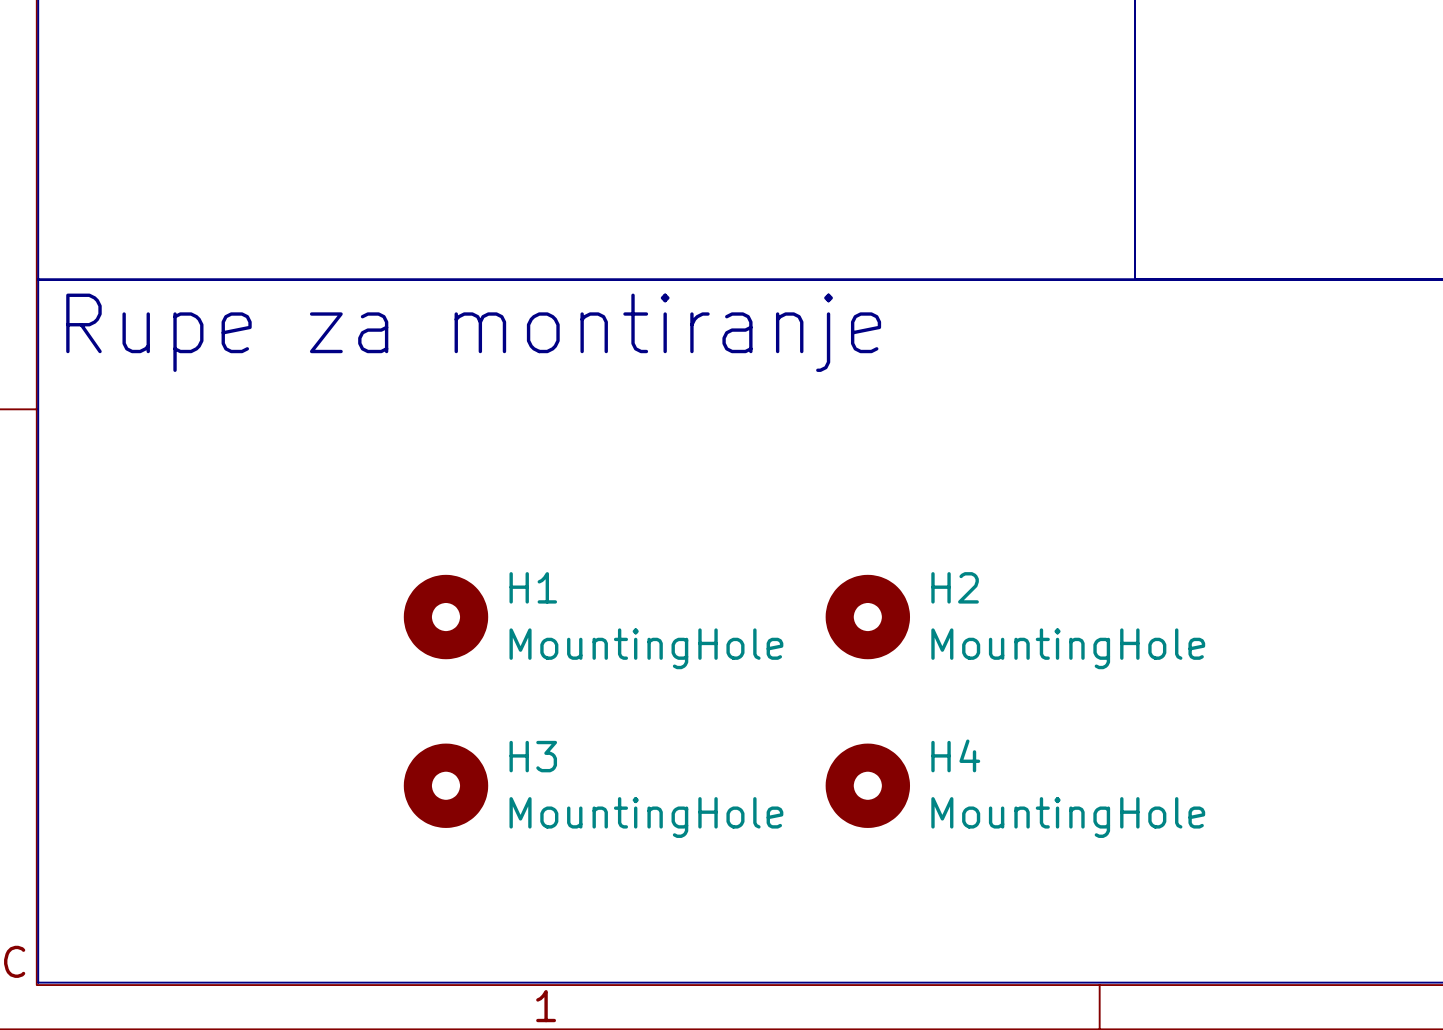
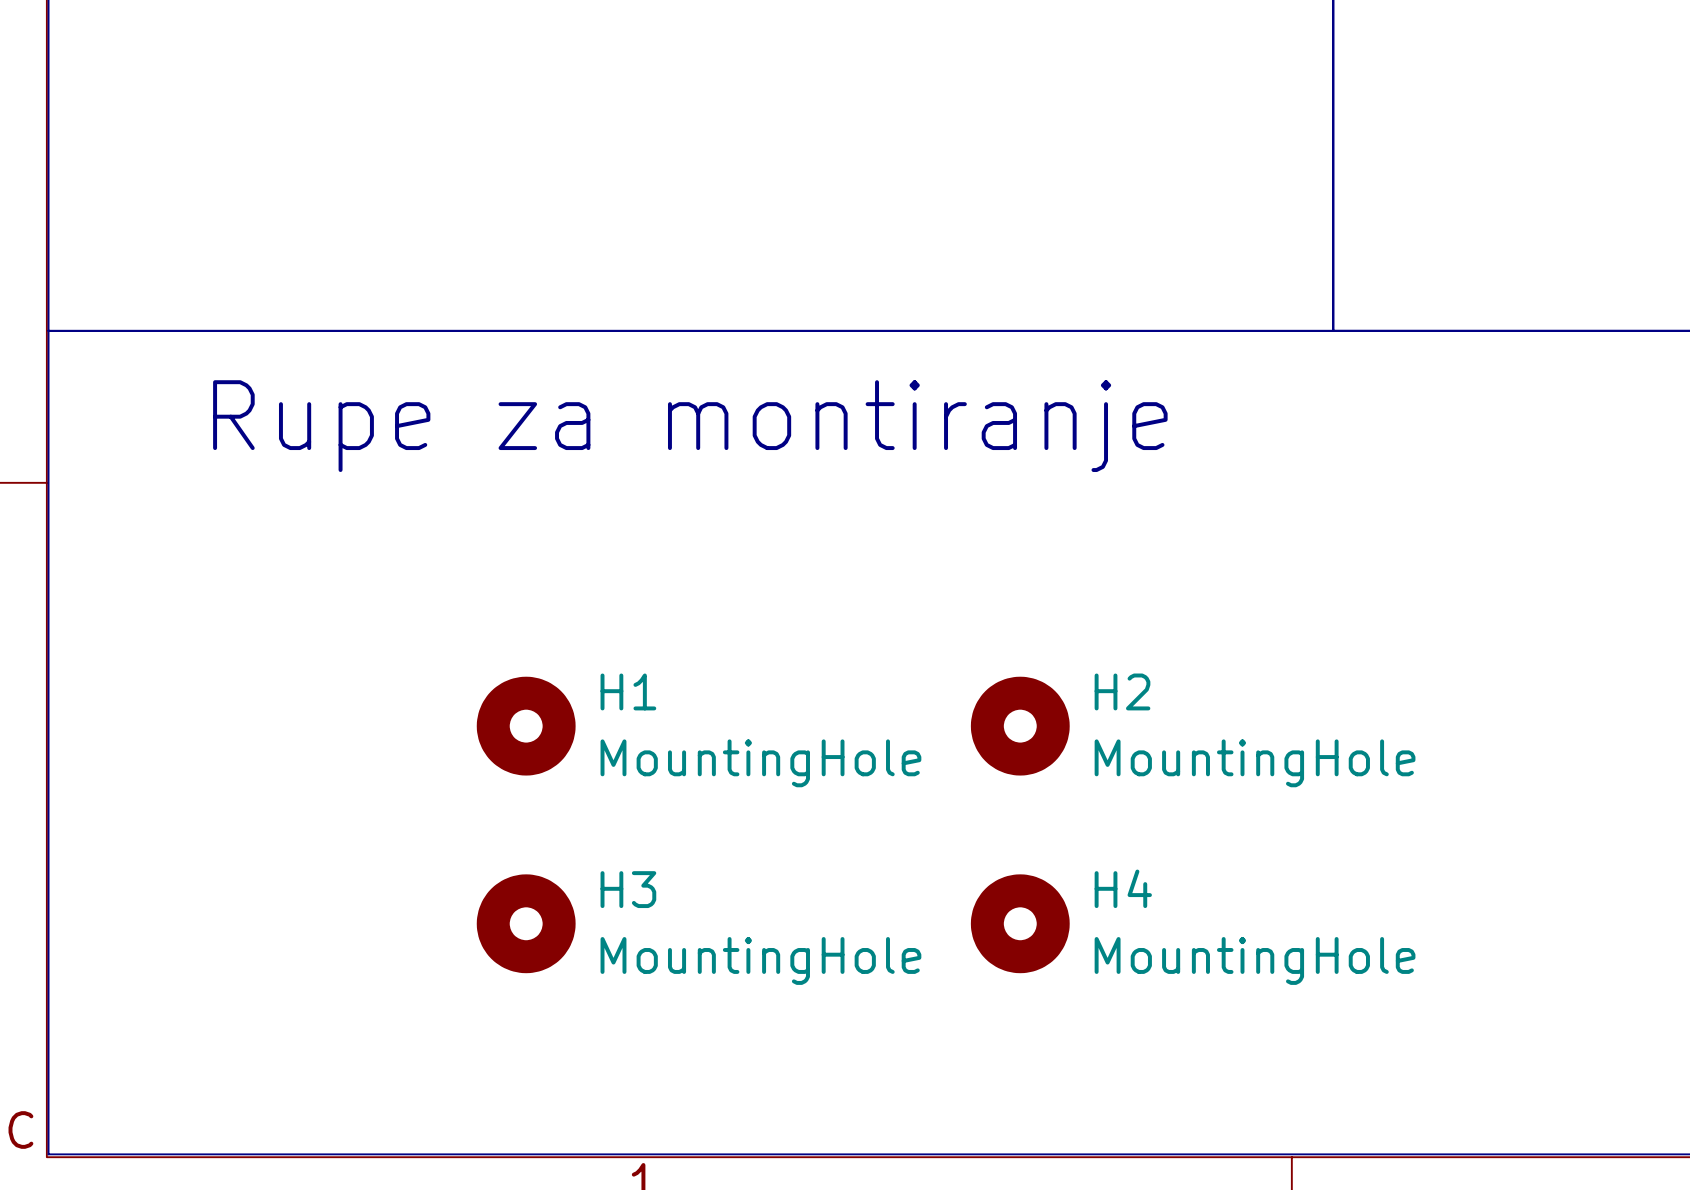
text position: Rupe za montiranje (473, 332) -> Rupe za montiranje (690, 426)

